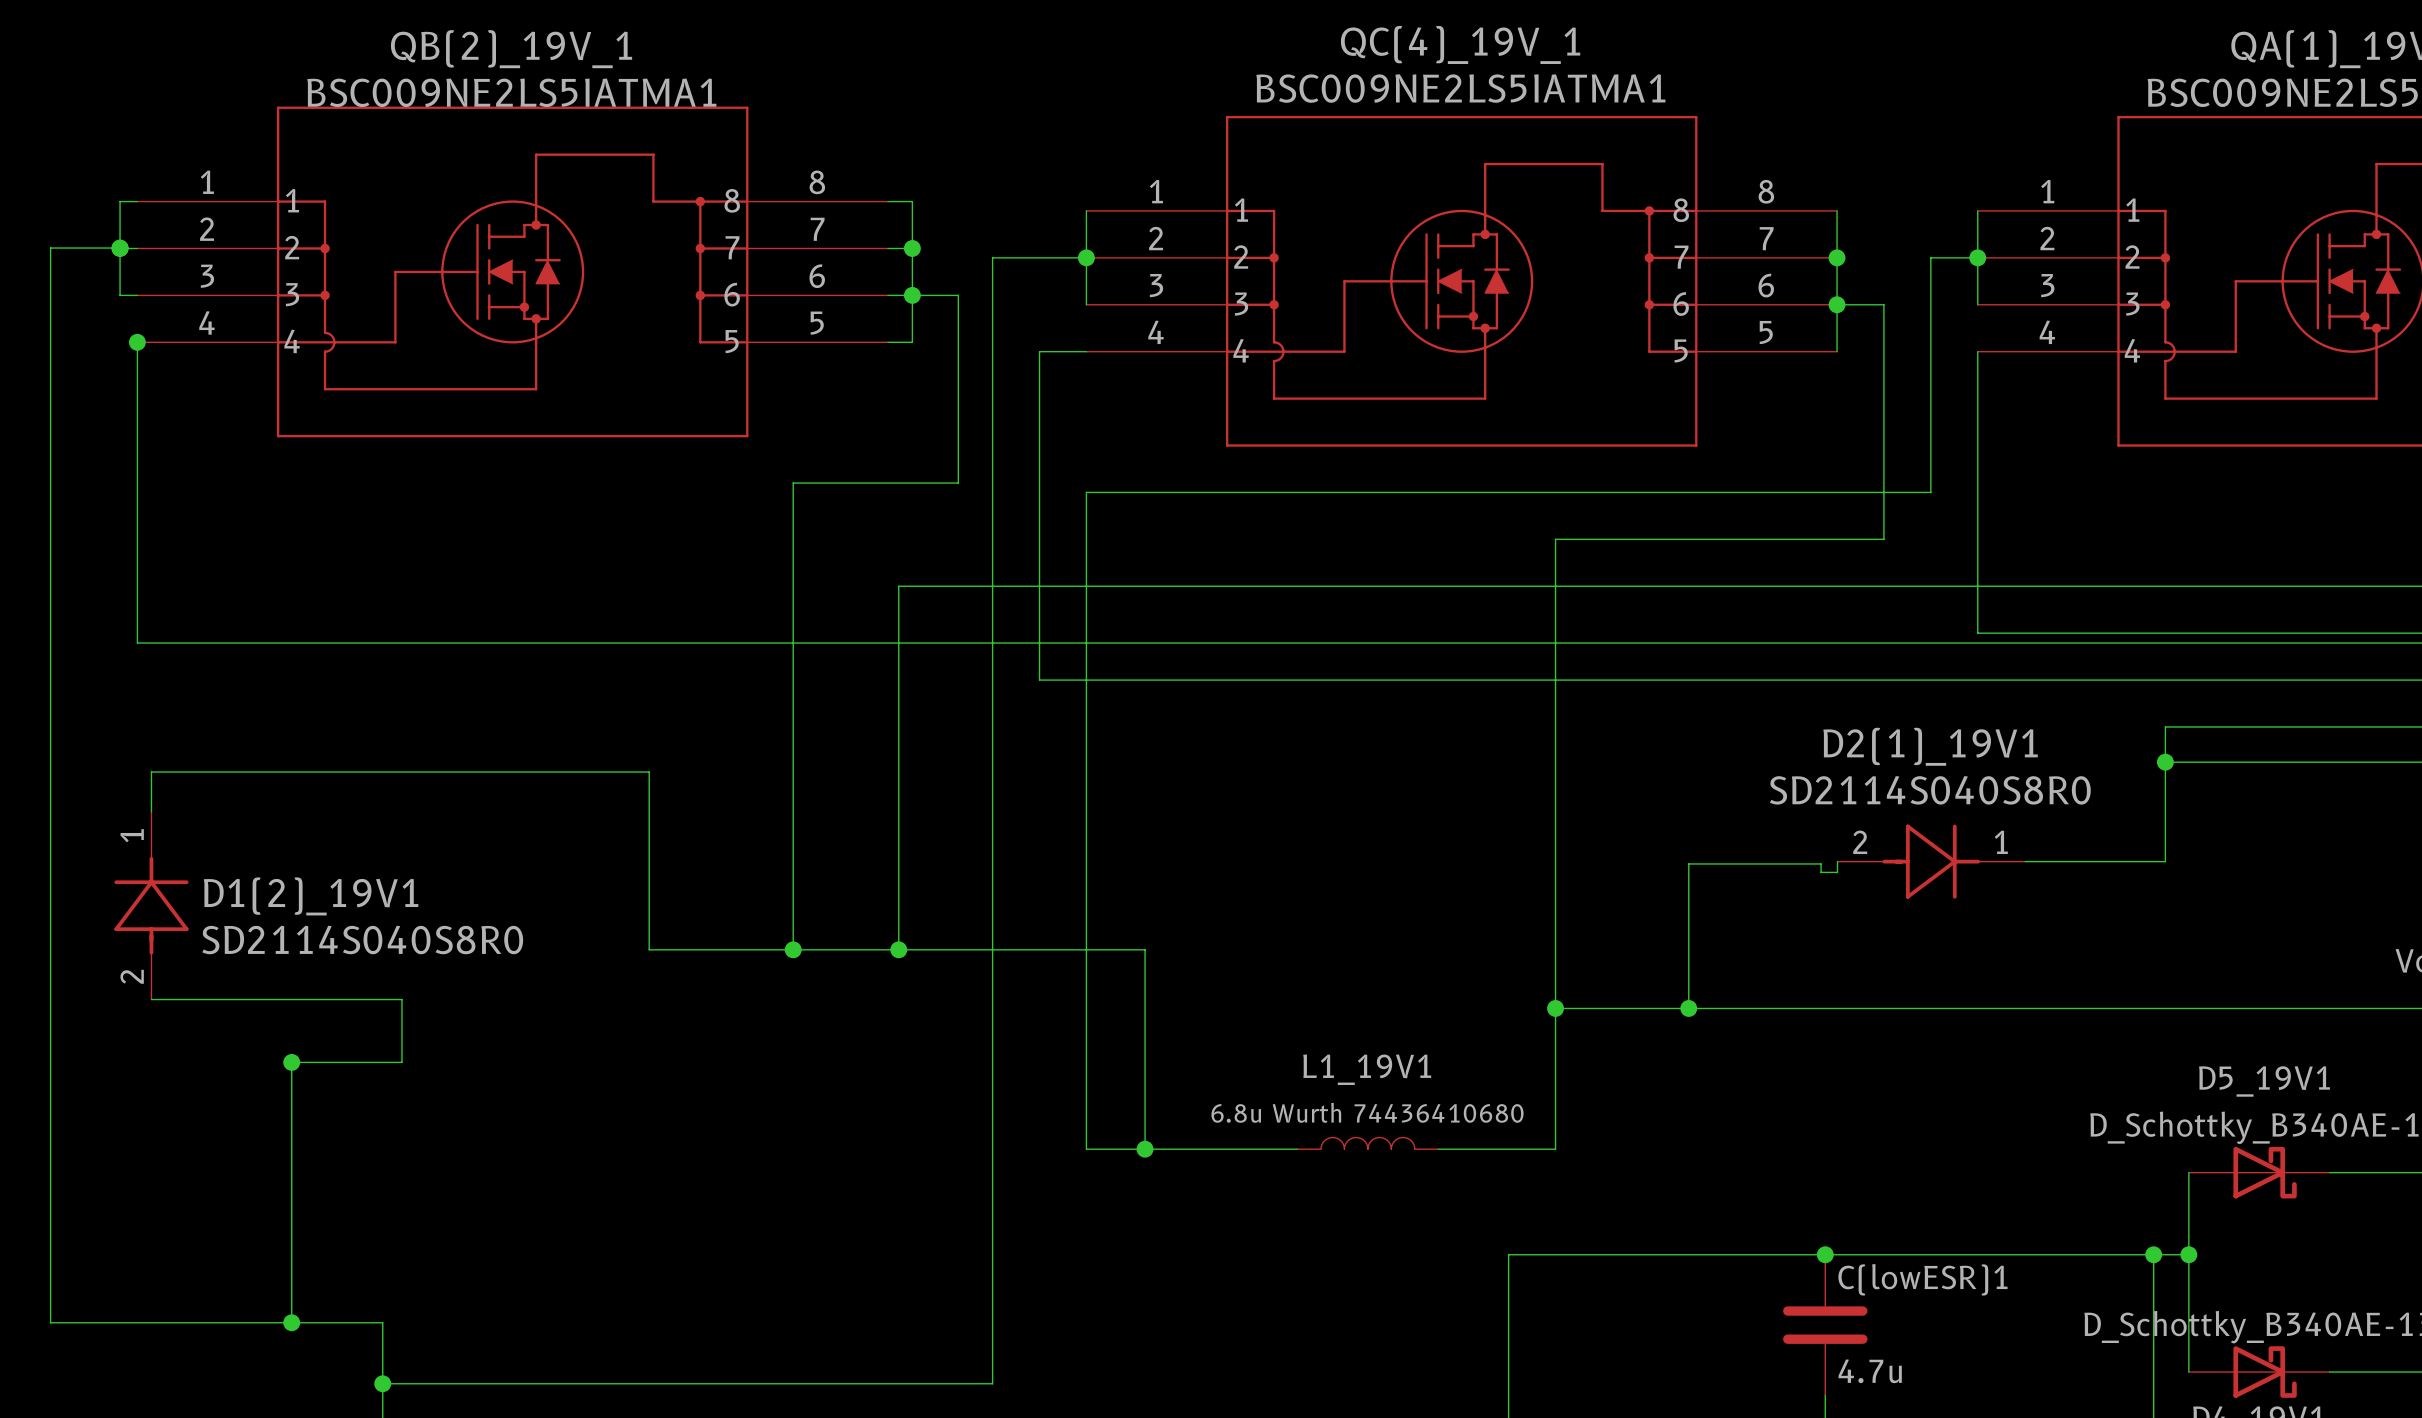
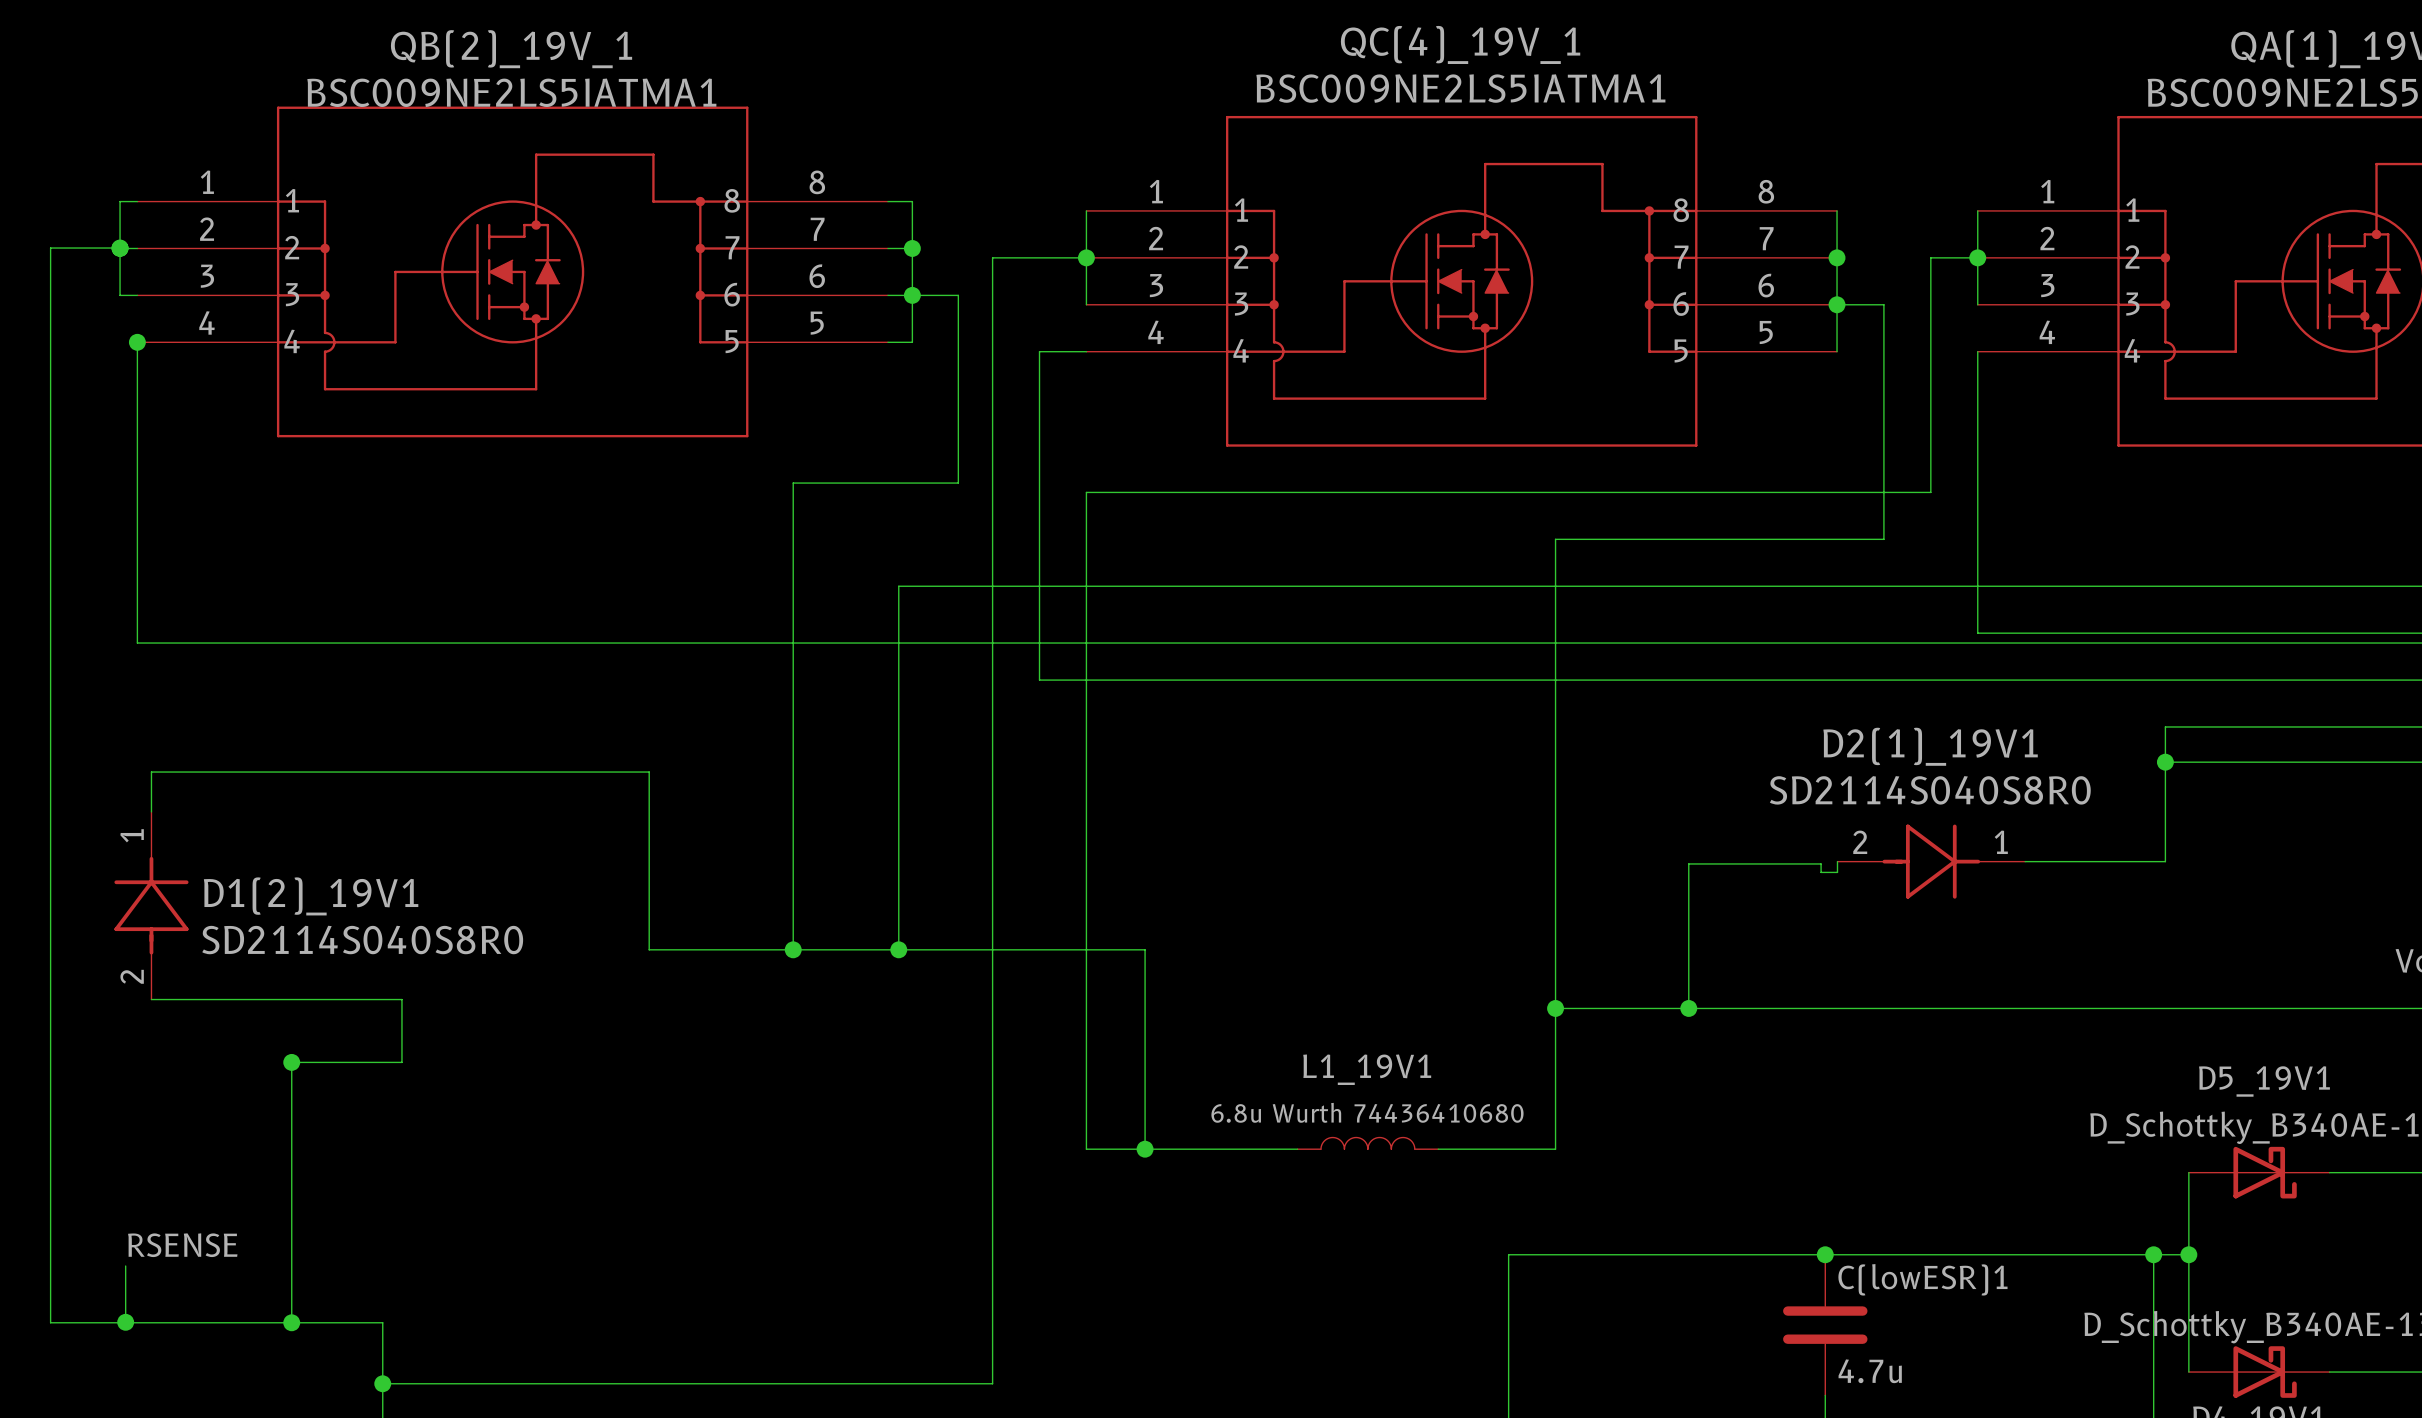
label: none -> RSENSE (182, 1245)
wire: none -> (125, 1266) (125, 1322)
junction: none -> (125, 1322)

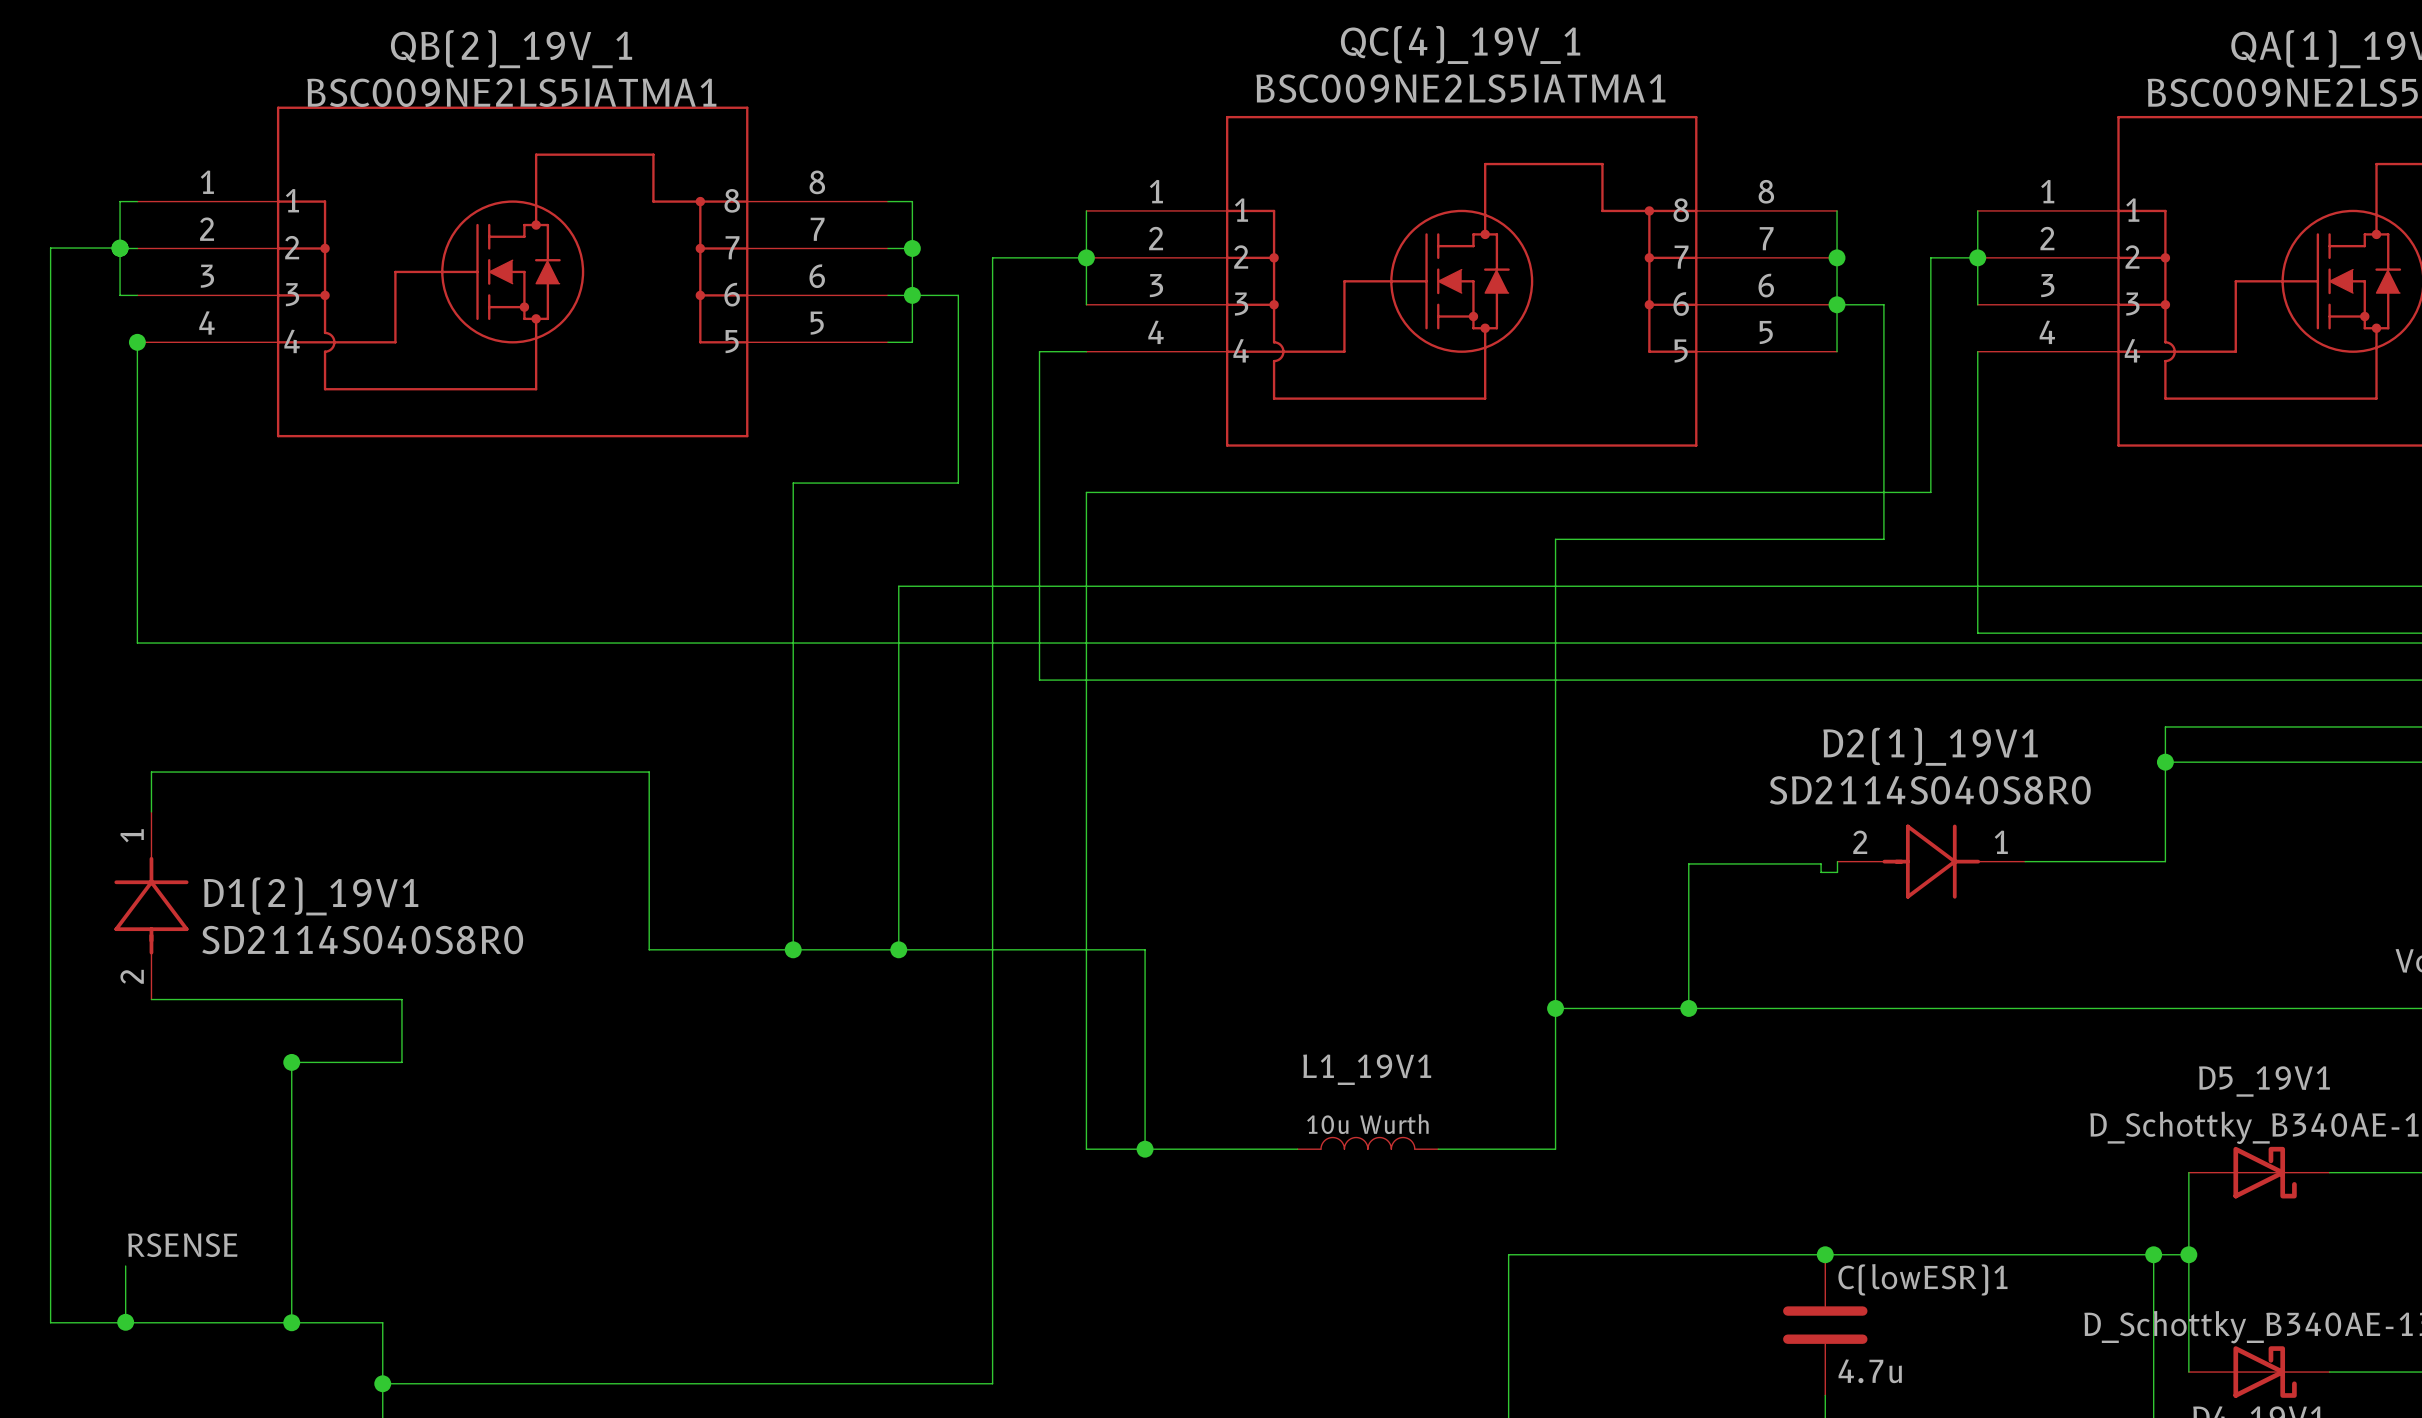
L1_19V1 value: 6.8u Wurth 74436410680 (1367, 1112) -> 10u Wurth (1367, 1124)

